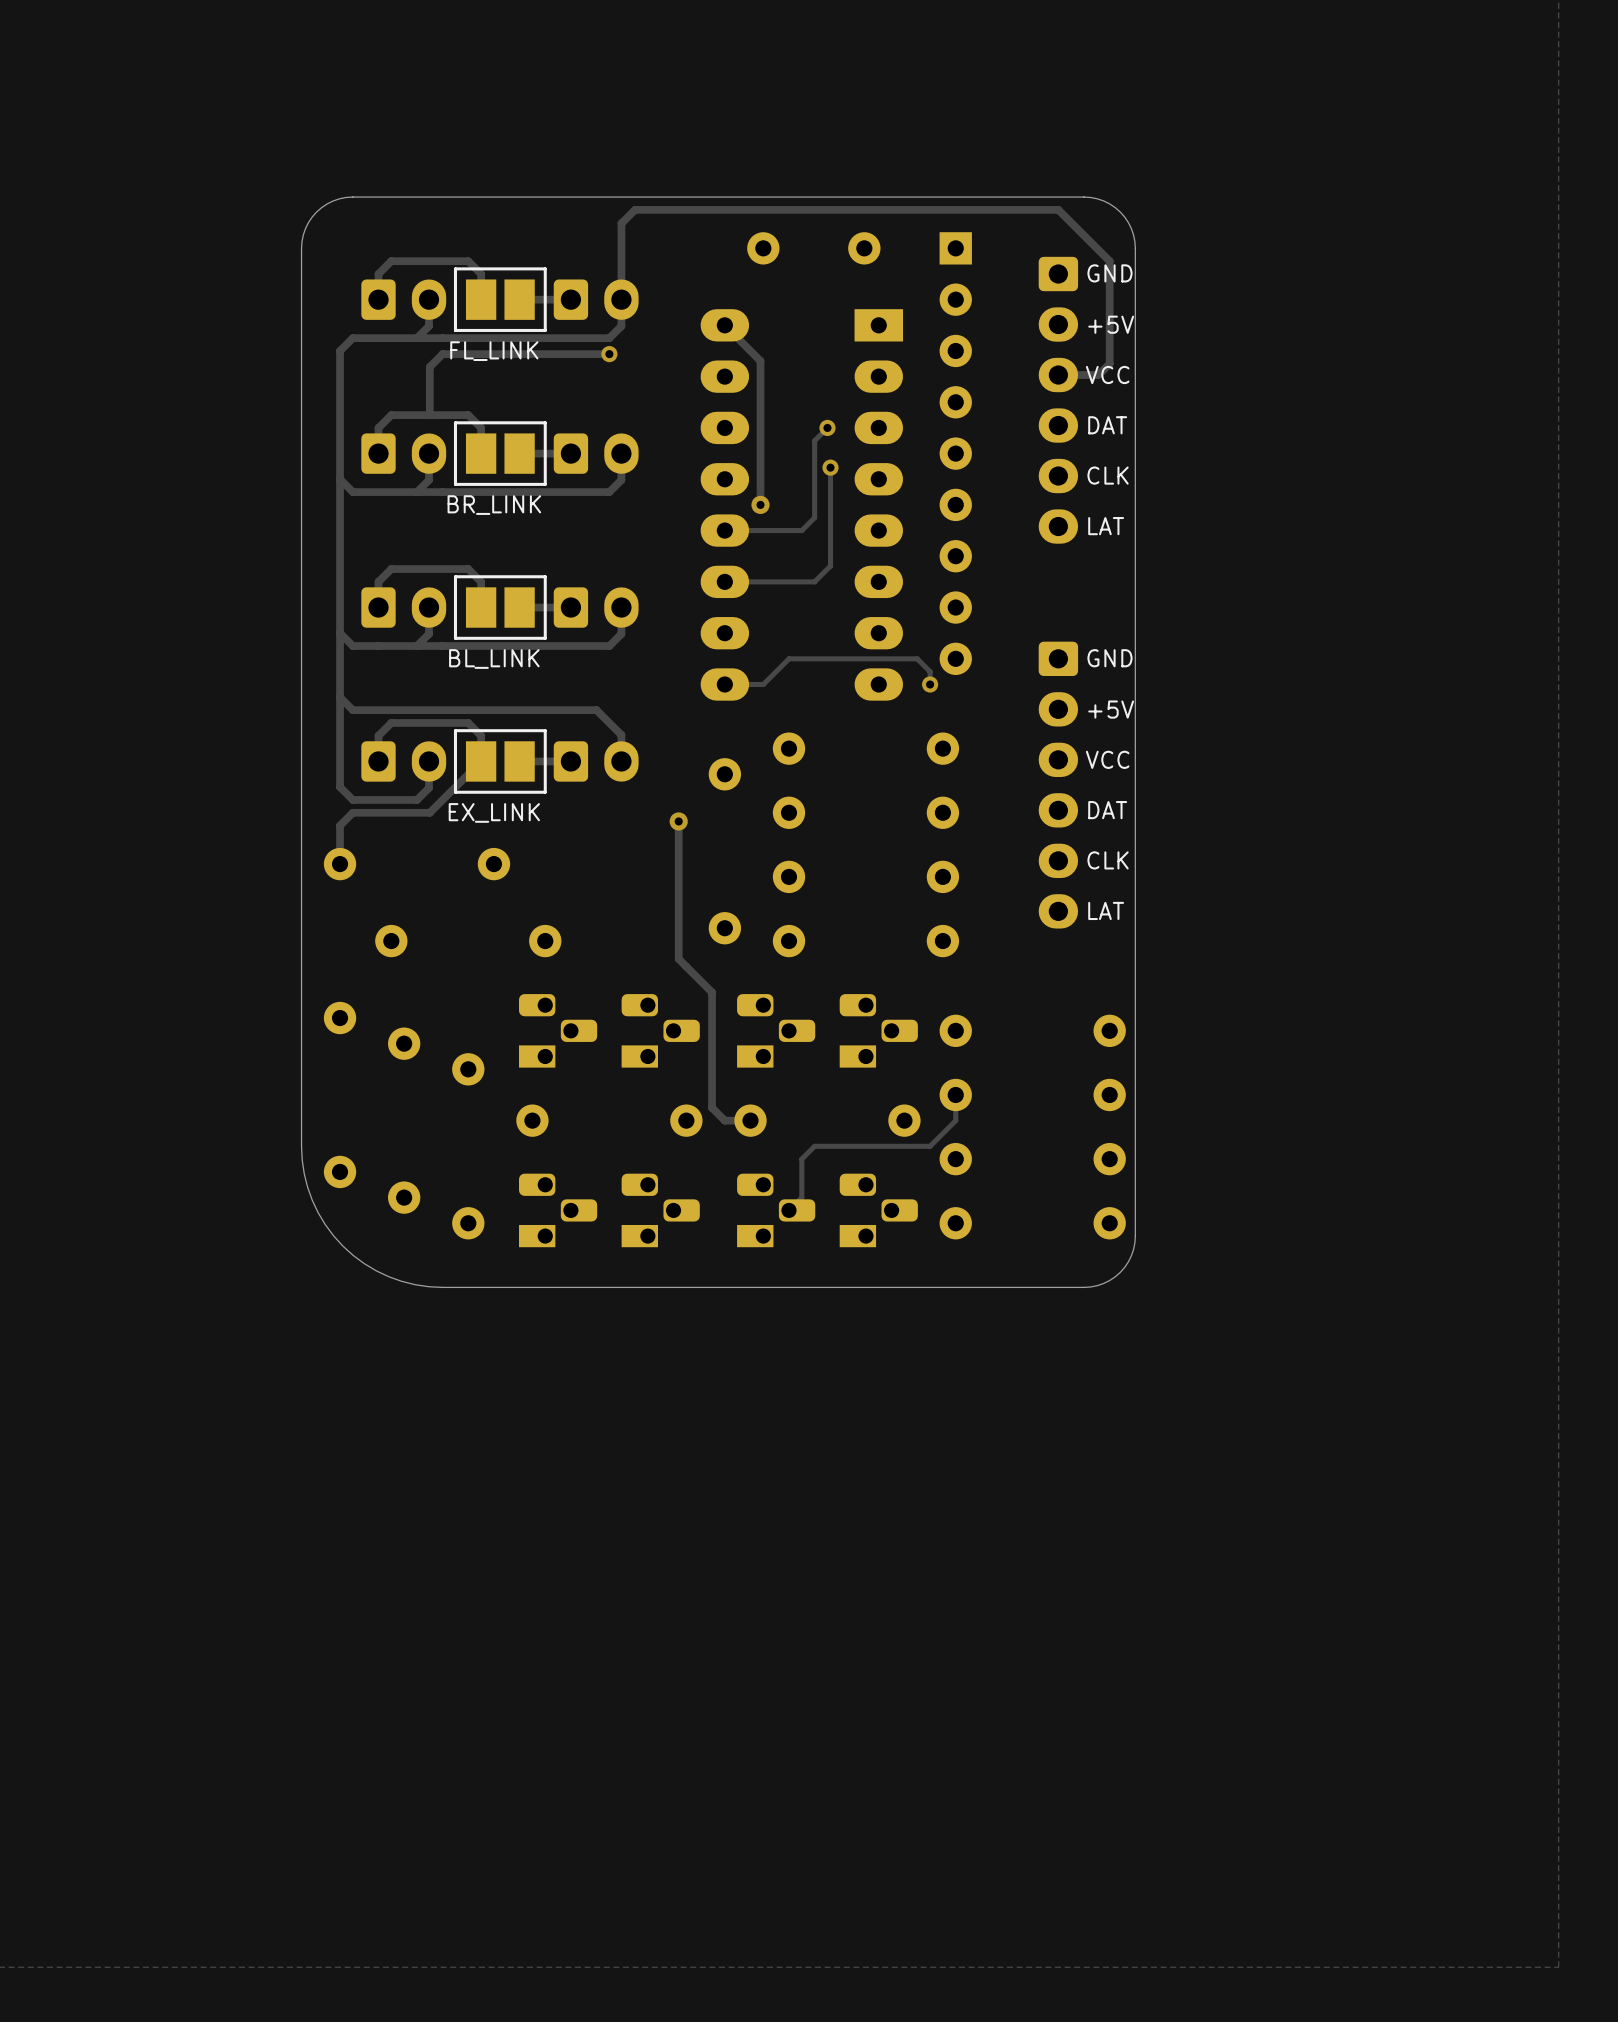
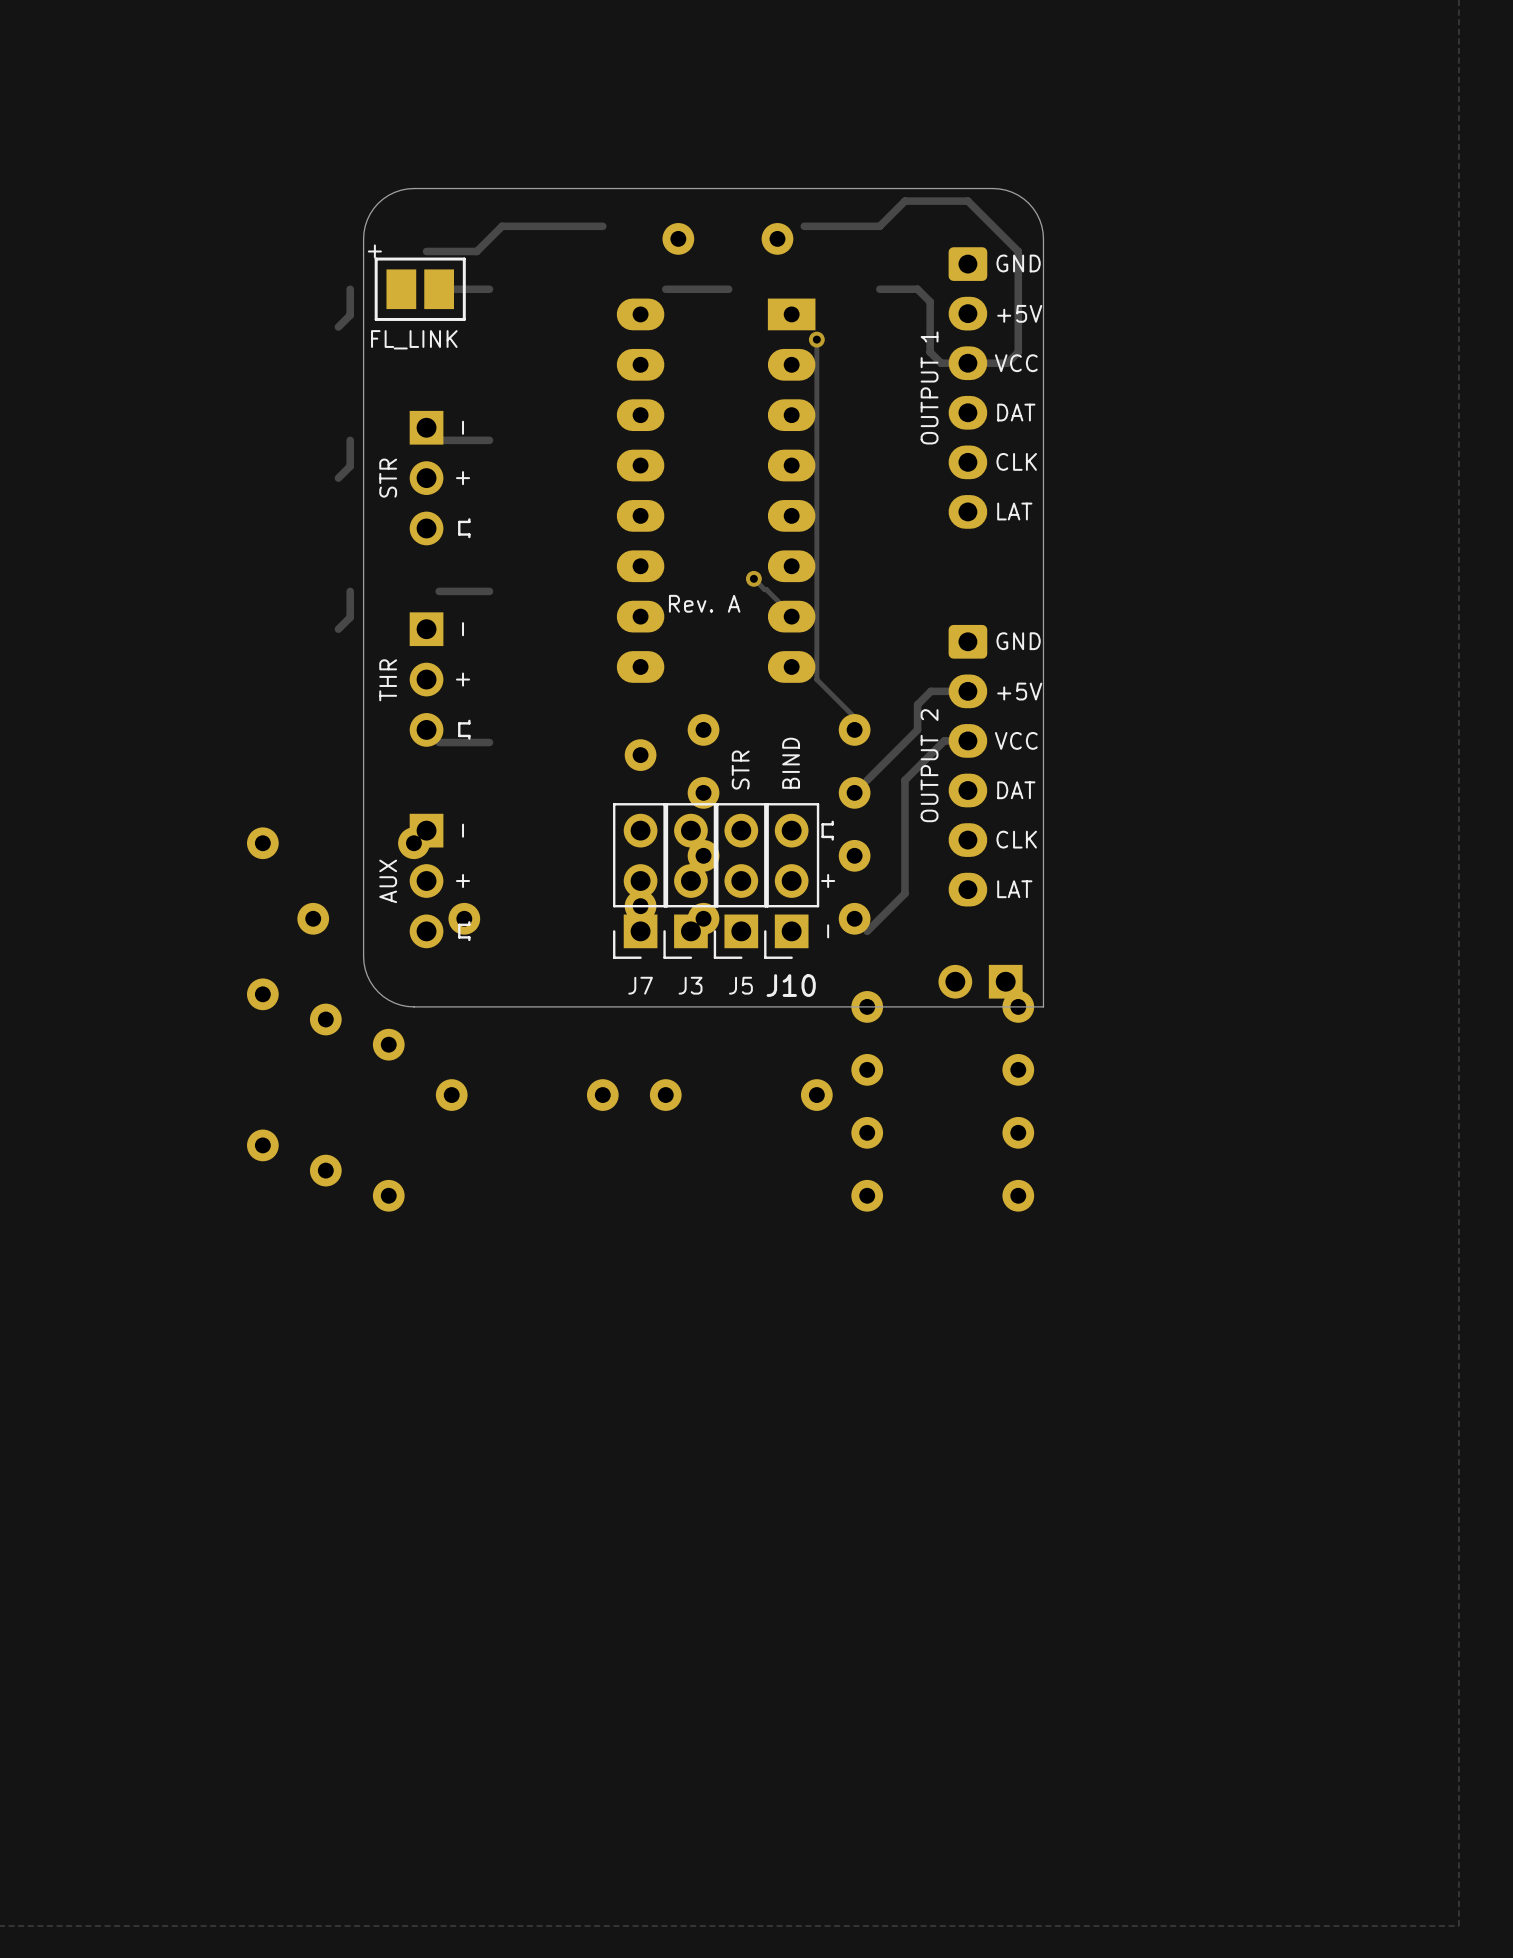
board edge: (493, 197) (352, 197) (339, 198) (327, 203) (316, 212) (308, 222) (303, 235) (301, 248) (301, 1146) -> (413, 188) (394, 192) (378, 203) (367, 219) (363, 238) (363, 956) (365, 969) (373, 987) (383, 996) (394, 1003) (413, 1006) (1043, 1006)
track: (994, 209) (635, 209) (621, 223) (621, 326) (609, 338) (352, 338) (340, 350) (340, 787) (352, 799) (416, 799) (429, 787) (429, 761) -> (904, 201) (879, 226) (804, 226)
track: none -> (602, 226) (502, 226) (476, 251) (426, 251)
text: none -> + (374, 251)
part: (403, 299) -> none
track: (481, 299) (481, 274) (468, 261) (391, 261) (378, 274) (378, 299) -> none
part: (596, 299) -> none
track: none -> (728, 289) (665, 289)
track: none -> (879, 289) (917, 289) (930, 301) (930, 352) (941, 363) (967, 363)
track: (724, 325) (760, 360) (760, 504) -> none
track: none -> (816, 339) (816, 679) (867, 729)
via: none -> (816, 339)
track: (609, 354) (442, 354) (429, 366) (429, 415) -> none
via: (609, 354) -> none
text: none -> OUTPUT 1 (929, 387)
track: (827, 427) (814, 440) (814, 517) (801, 530) (724, 530) -> none
via: (827, 427) -> none
text: none -> - (463, 427)
part: (403, 453) -> none
track: (481, 453) (481, 427) (468, 415) (391, 415) (378, 427) (378, 453) -> none
part: BR_LINK (500, 453) -> none
part: (596, 453) -> none
track: (621, 453) (621, 480) (609, 492) (352, 492) (340, 479) -> none
part: (955, 453) -> none
track: (830, 467) (830, 566) (814, 581) (724, 581) -> none
via: (830, 467) -> none
text: none -> STR (388, 478)
part: none -> (426, 478)
text: none -> + (463, 478)
via: (760, 504) -> none
line: none -> (469, 519) (469, 521) (459, 521) (459, 534) (469, 534) (469, 537)
track: none -> (753, 578) (780, 604)
via: none -> (753, 578)
part: (403, 607) -> none
track: (481, 607) (481, 581) (468, 569) (391, 569) (378, 581) (378, 607) -> none
part: BL_LINK (500, 607) -> none
part: (596, 607) -> none
track: (621, 607) (621, 633) (609, 646) (352, 646) (340, 633) -> none
text: none -> Rev. A (704, 603)
text: none -> - (463, 629)
track: (930, 684) (930, 671) (917, 658) (788, 658) (763, 684) (724, 684) -> none
via: (930, 684) -> none
track: (340, 697) (352, 710) (596, 710) (621, 735) (621, 761) -> none
part: none -> (426, 679)
text: none -> + (463, 679)
text: none -> THR (388, 680)
track: none -> (967, 691) (930, 691) (917, 704) (917, 729) (867, 780)
line: none -> (469, 720) (469, 723) (459, 723) (459, 735) (469, 735) (469, 738)
track: none -> (967, 740) (944, 740) (904, 780) (904, 893) (867, 931)
track: (378, 761) (378, 735) (391, 722) (468, 722) (481, 735) (481, 761) (429, 812) (352, 812) (340, 825) (340, 864) -> none
part: (403, 761) -> none
part: EX_LINK (500, 761) -> none
part: (596, 761) -> none
text: none -> BIND (791, 763)
text: none -> OUTPUT 2 (929, 765)
text: none -> STR (740, 770)
track: (678, 821) (678, 959) (712, 992) (712, 1107) (724, 1120) (750, 1120) -> none
via: (678, 821) -> none
line: none -> (832, 821) (832, 824) (822, 824) (822, 836) (832, 836) (832, 839)
text: none -> - (463, 830)
text: none -> AUX (388, 881)
part: none -> (426, 881)
text: none -> + (463, 881)
J7: none -> (640, 881)
J3: none -> (690, 881)
J5: none -> (741, 881)
J10: none -> (791, 881)
text: none -> + (828, 881)
line: none -> (469, 922) (469, 924) (459, 924) (459, 937) (469, 937) (469, 939)
text: none -> - (828, 931)
part: none -> (980, 981)
part: (558, 1030) -> none
part: (660, 1030) -> none
part: (776, 1030) -> none
part: (878, 1030) -> none
board edge: (1135, 1030) (1134, 1242) (1128, 1261) (1120, 1272) (1103, 1283) (1090, 1286) (442, 1287) (415, 1284) (388, 1276) (364, 1263) (333, 1235) (318, 1212) (307, 1187) (301, 1146) -> none
track: (955, 1094) (955, 1120) (930, 1146) (814, 1146) (801, 1159) (801, 1197) (788, 1210) -> none
part: (558, 1210) -> none
part: (660, 1210) -> none
part: (776, 1210) -> none
part: (878, 1210) -> none

